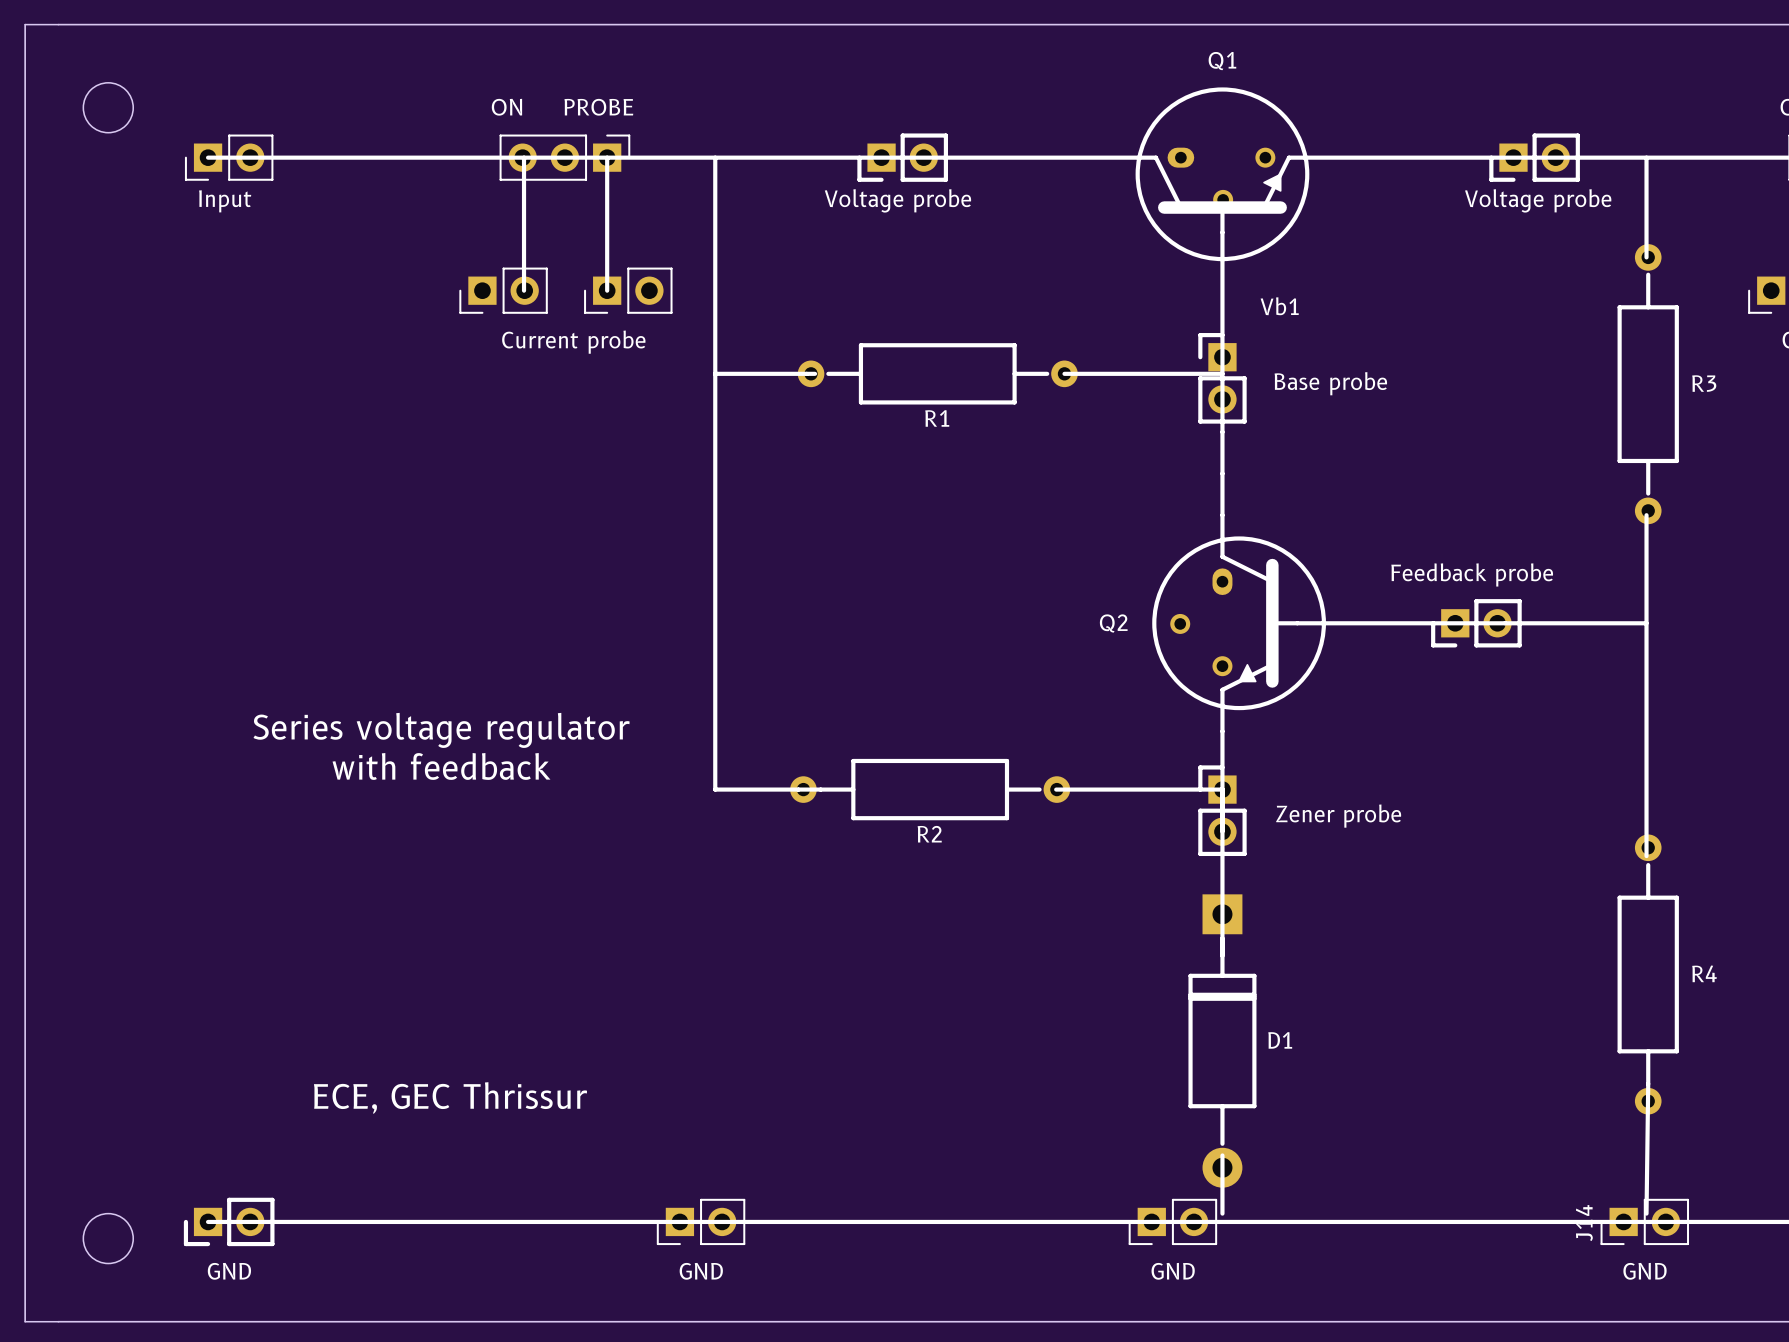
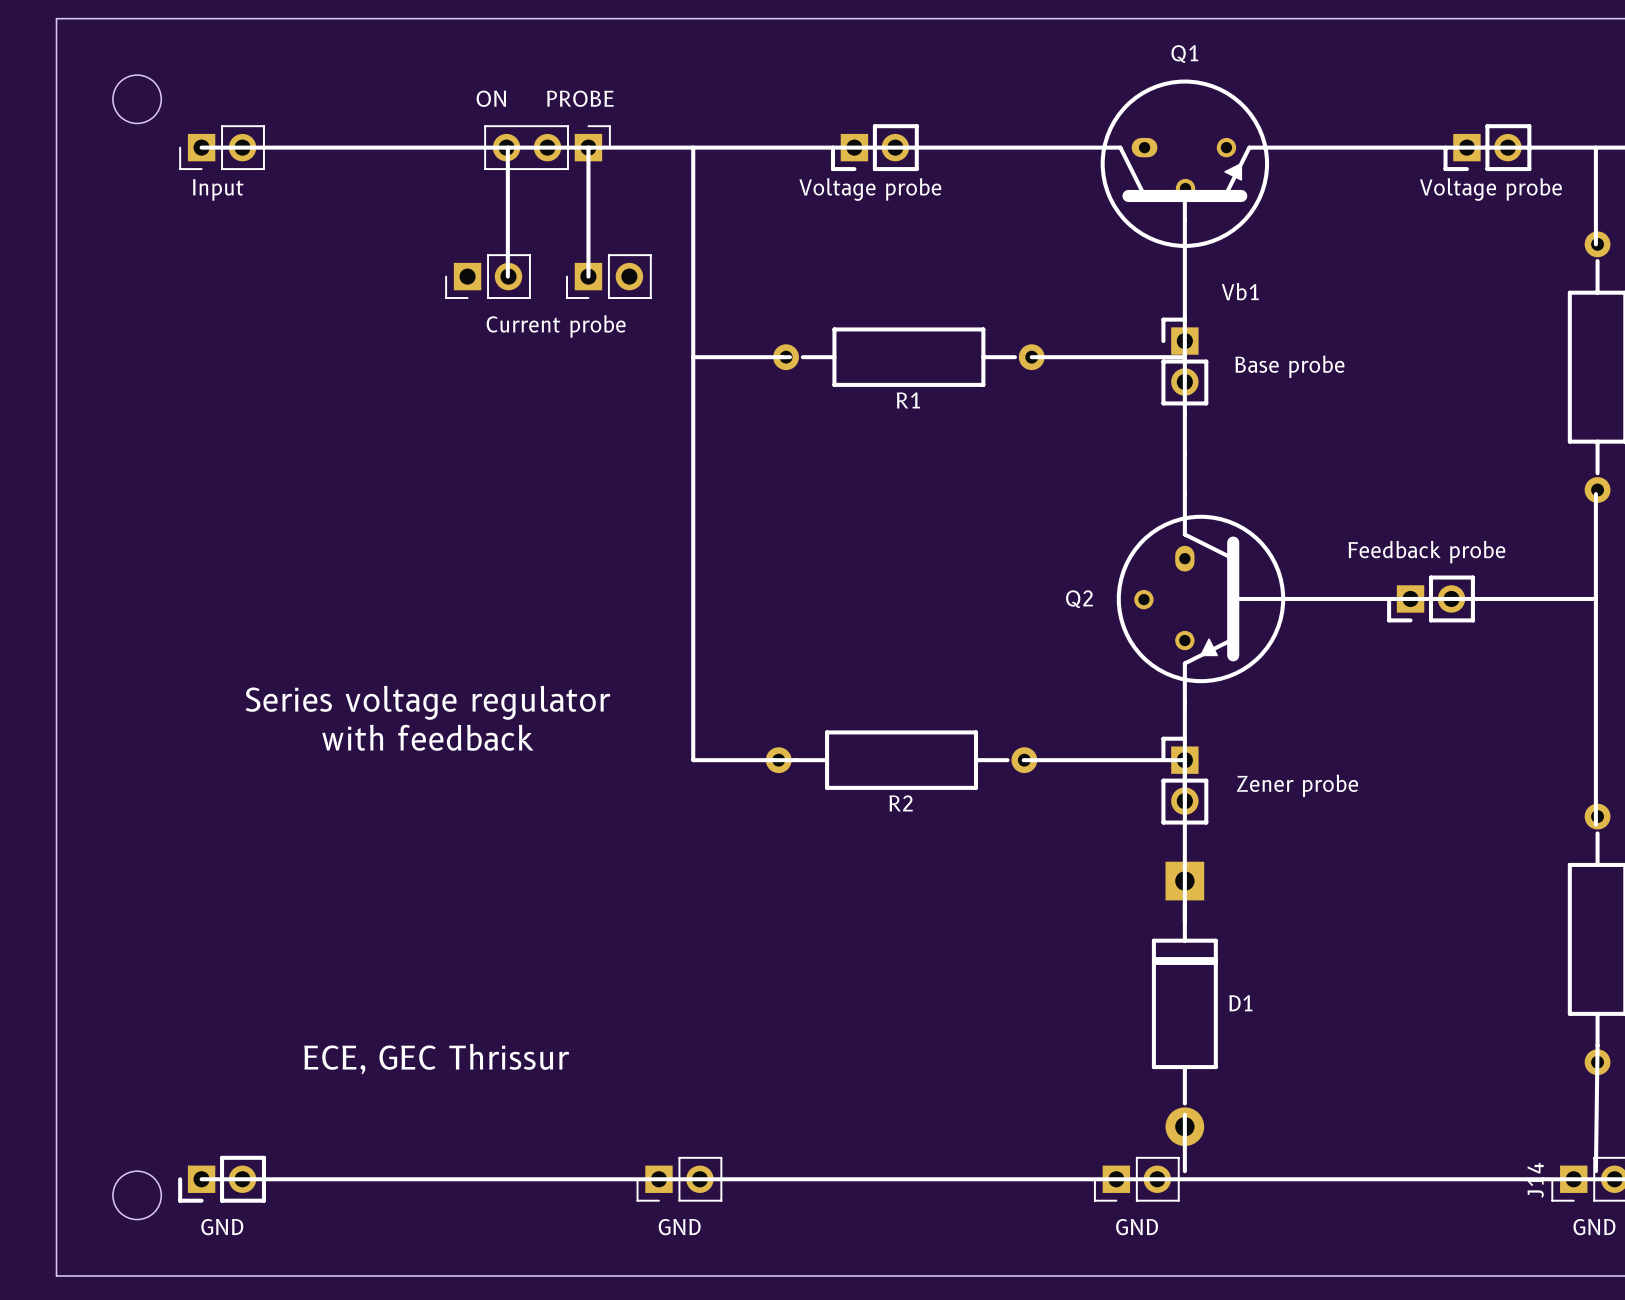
board edge: (58, 24) (25, 24) (25, 1321) (58, 1321) -> (56, 18) (56, 1275)
round board edge position: (108, 107) -> (137, 99)
round board edge position: (108, 1238) -> (137, 1195)

